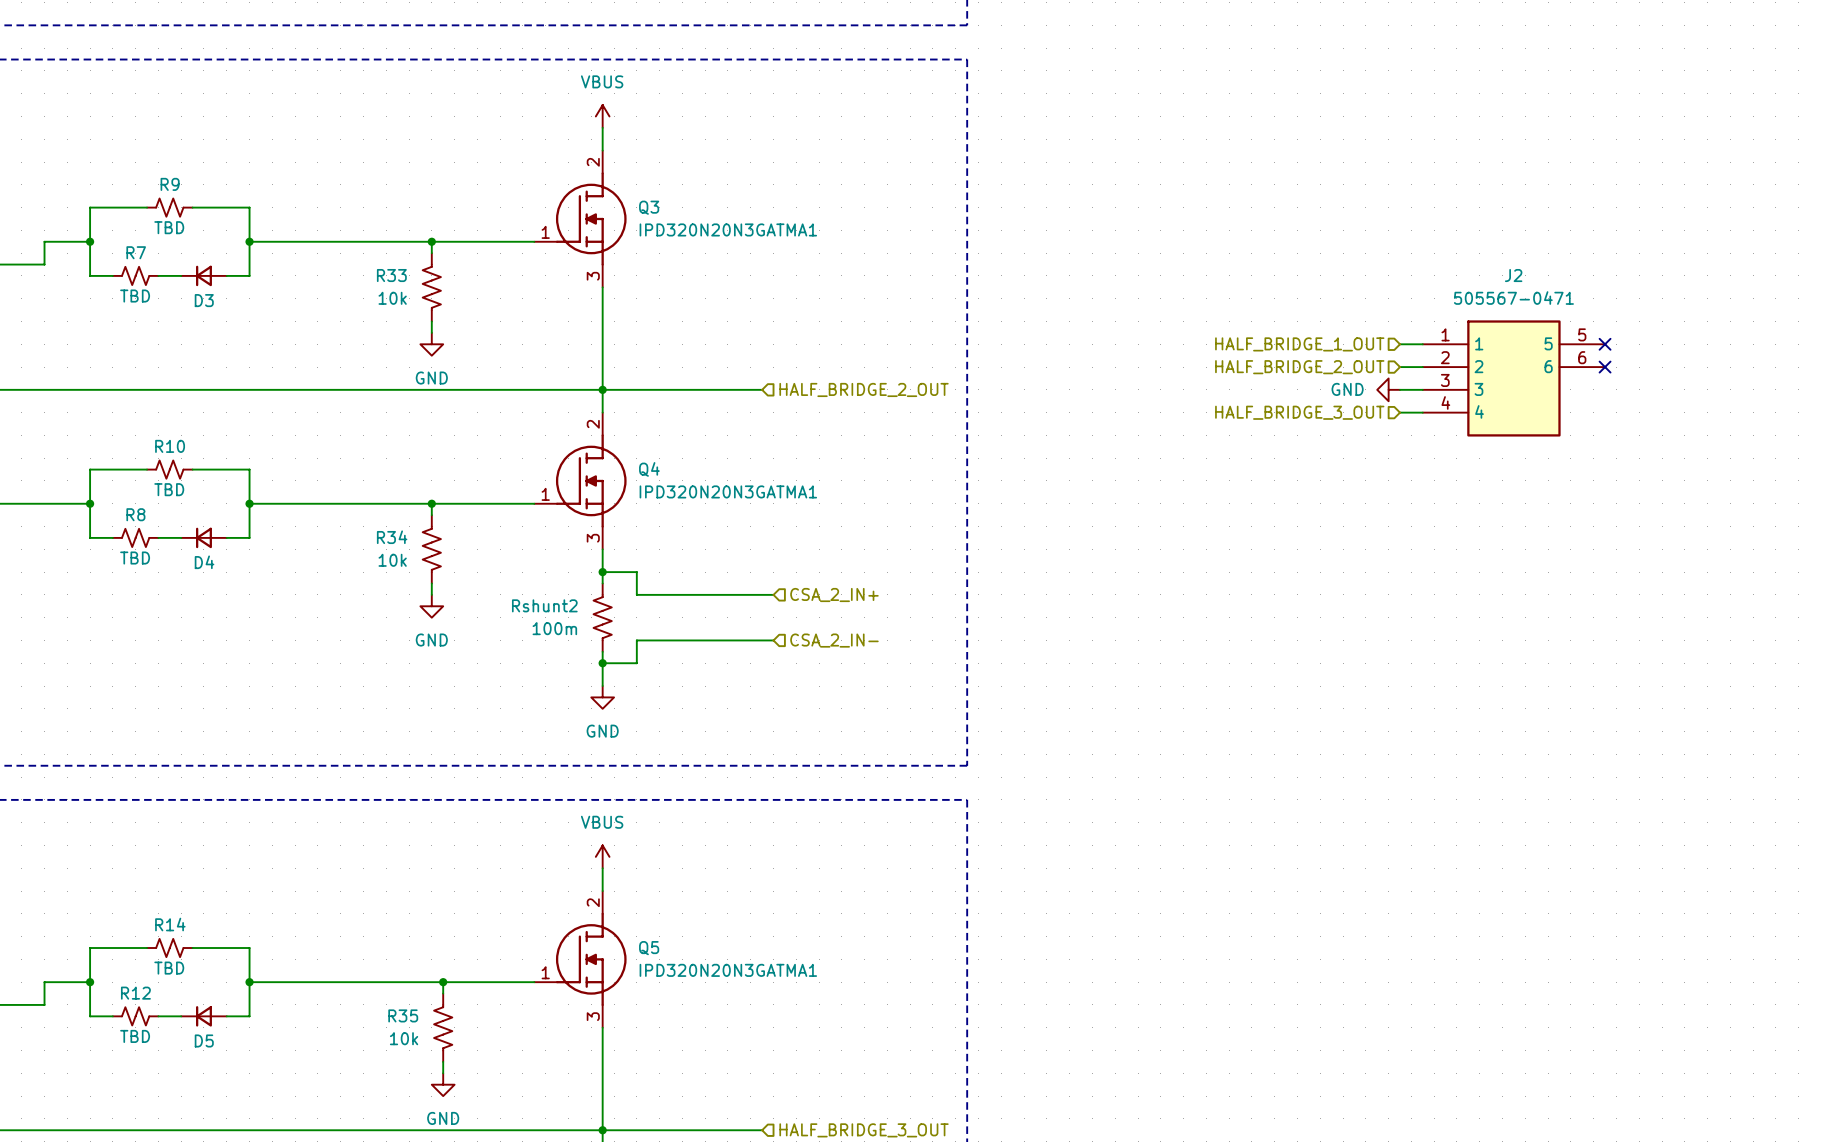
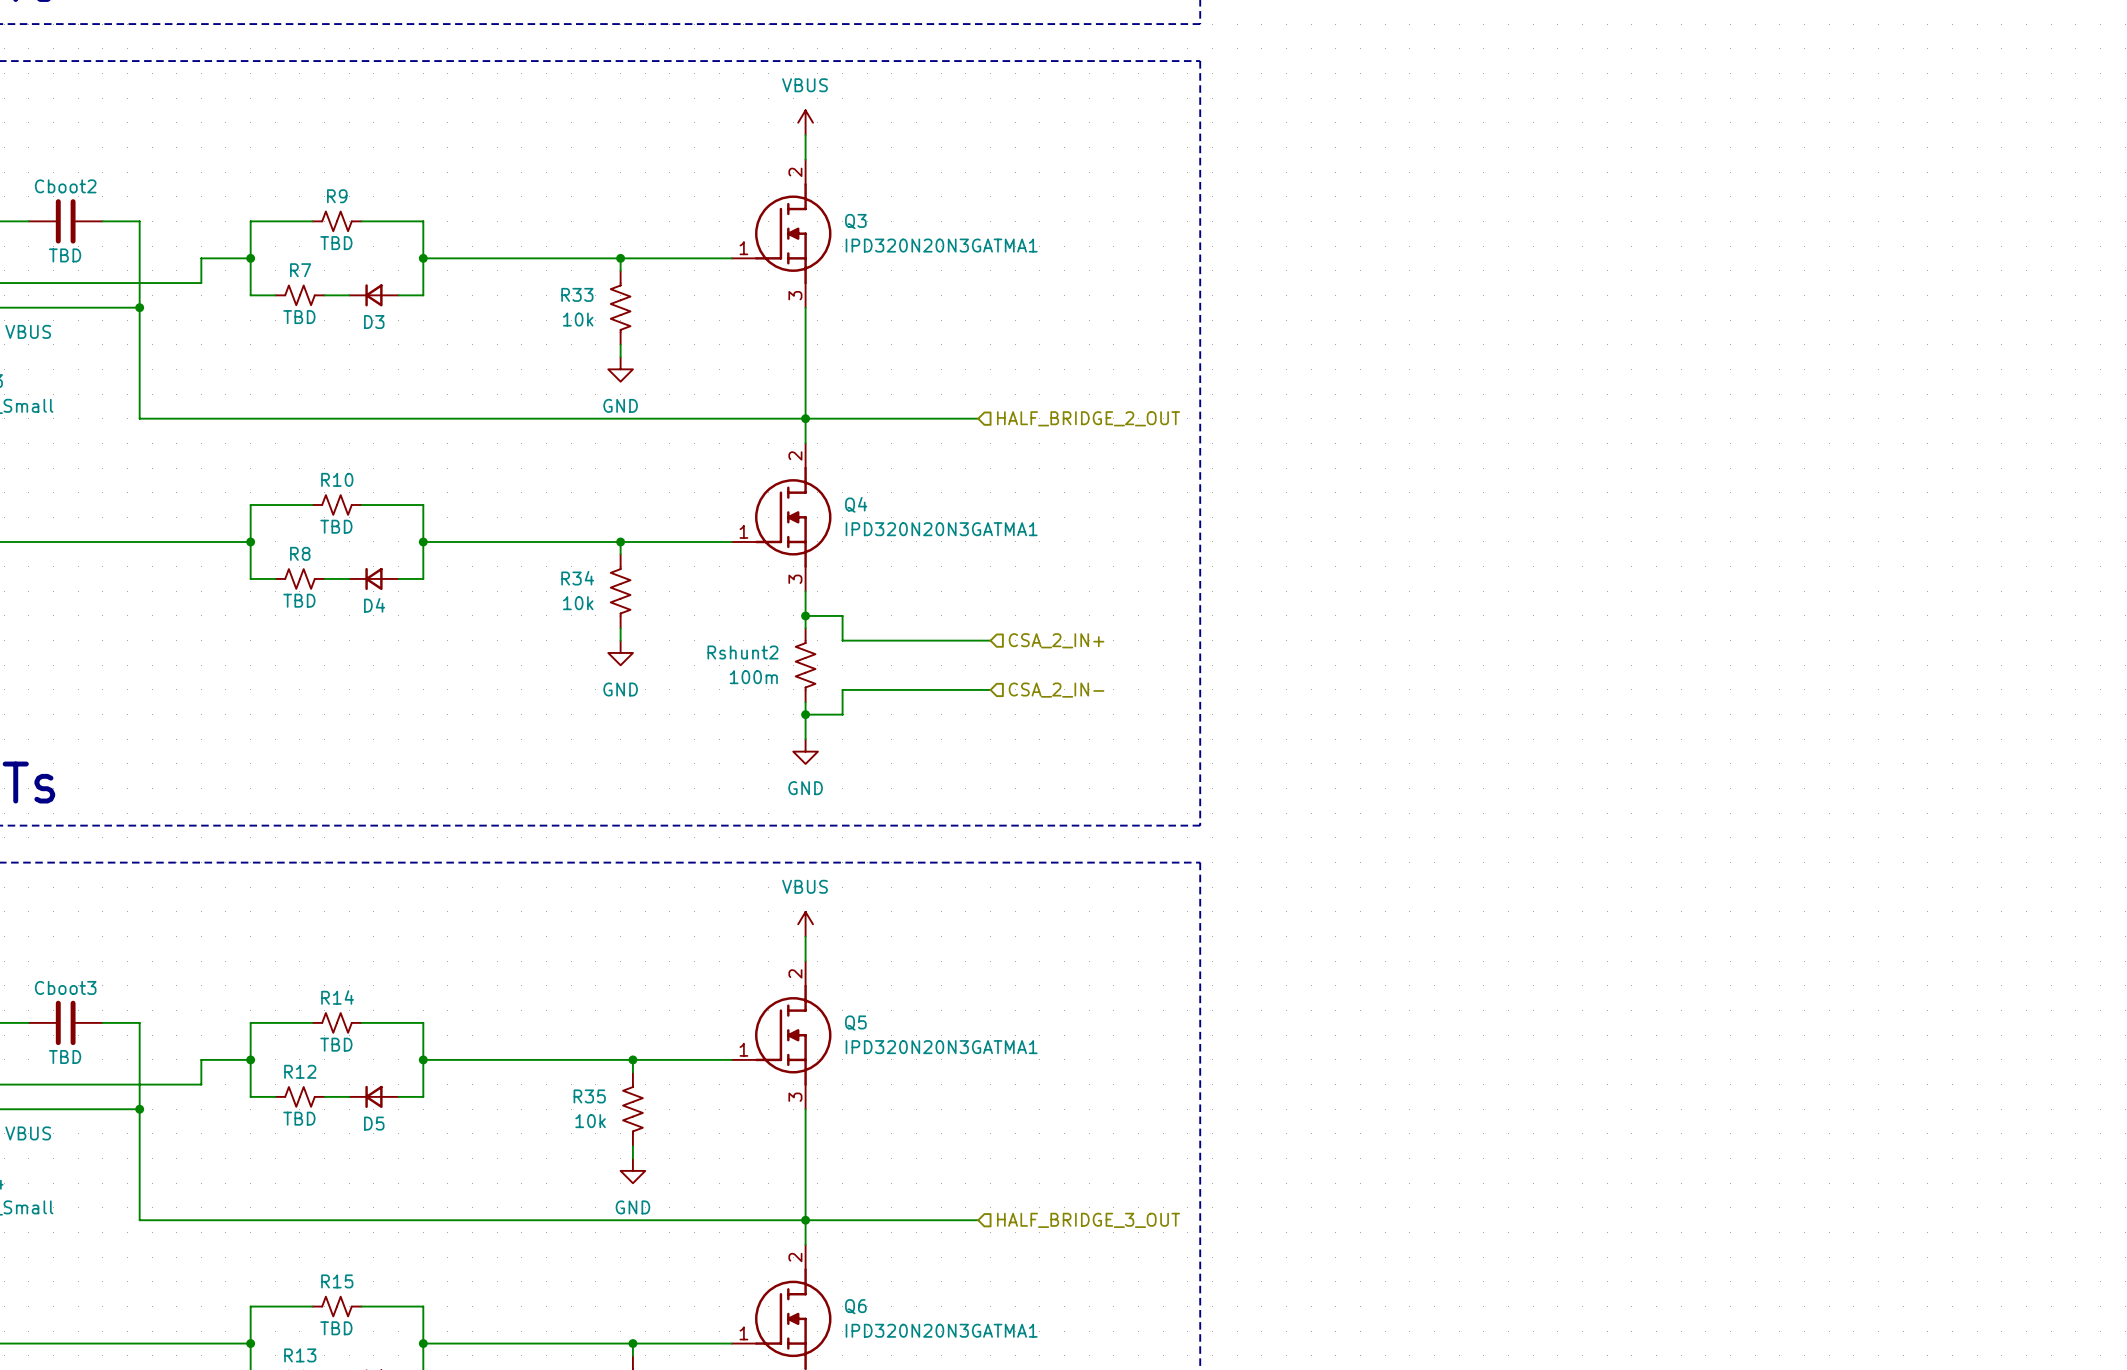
hierarchical label: HALF_BRIDGE_1_OUT (1299, 344) -> none
wire: (1400, 344) (1422, 344) -> none
no-connect mark: (1605, 344) -> none
hierarchical label: HALF_BRIDGE_2_OUT (1299, 367) -> none
wire: (1400, 367) (1422, 367) -> none
no-connect mark: (1605, 367) -> none
J2: 505567-0471 (1513, 378) -> none
power symbol: GND (1388, 389) -> none
wire: (1400, 389) (1422, 389) -> none
hierarchical label: HALF_BRIDGE_3_OUT (1299, 412) -> none
wire: (1400, 412) (1422, 412) -> none

